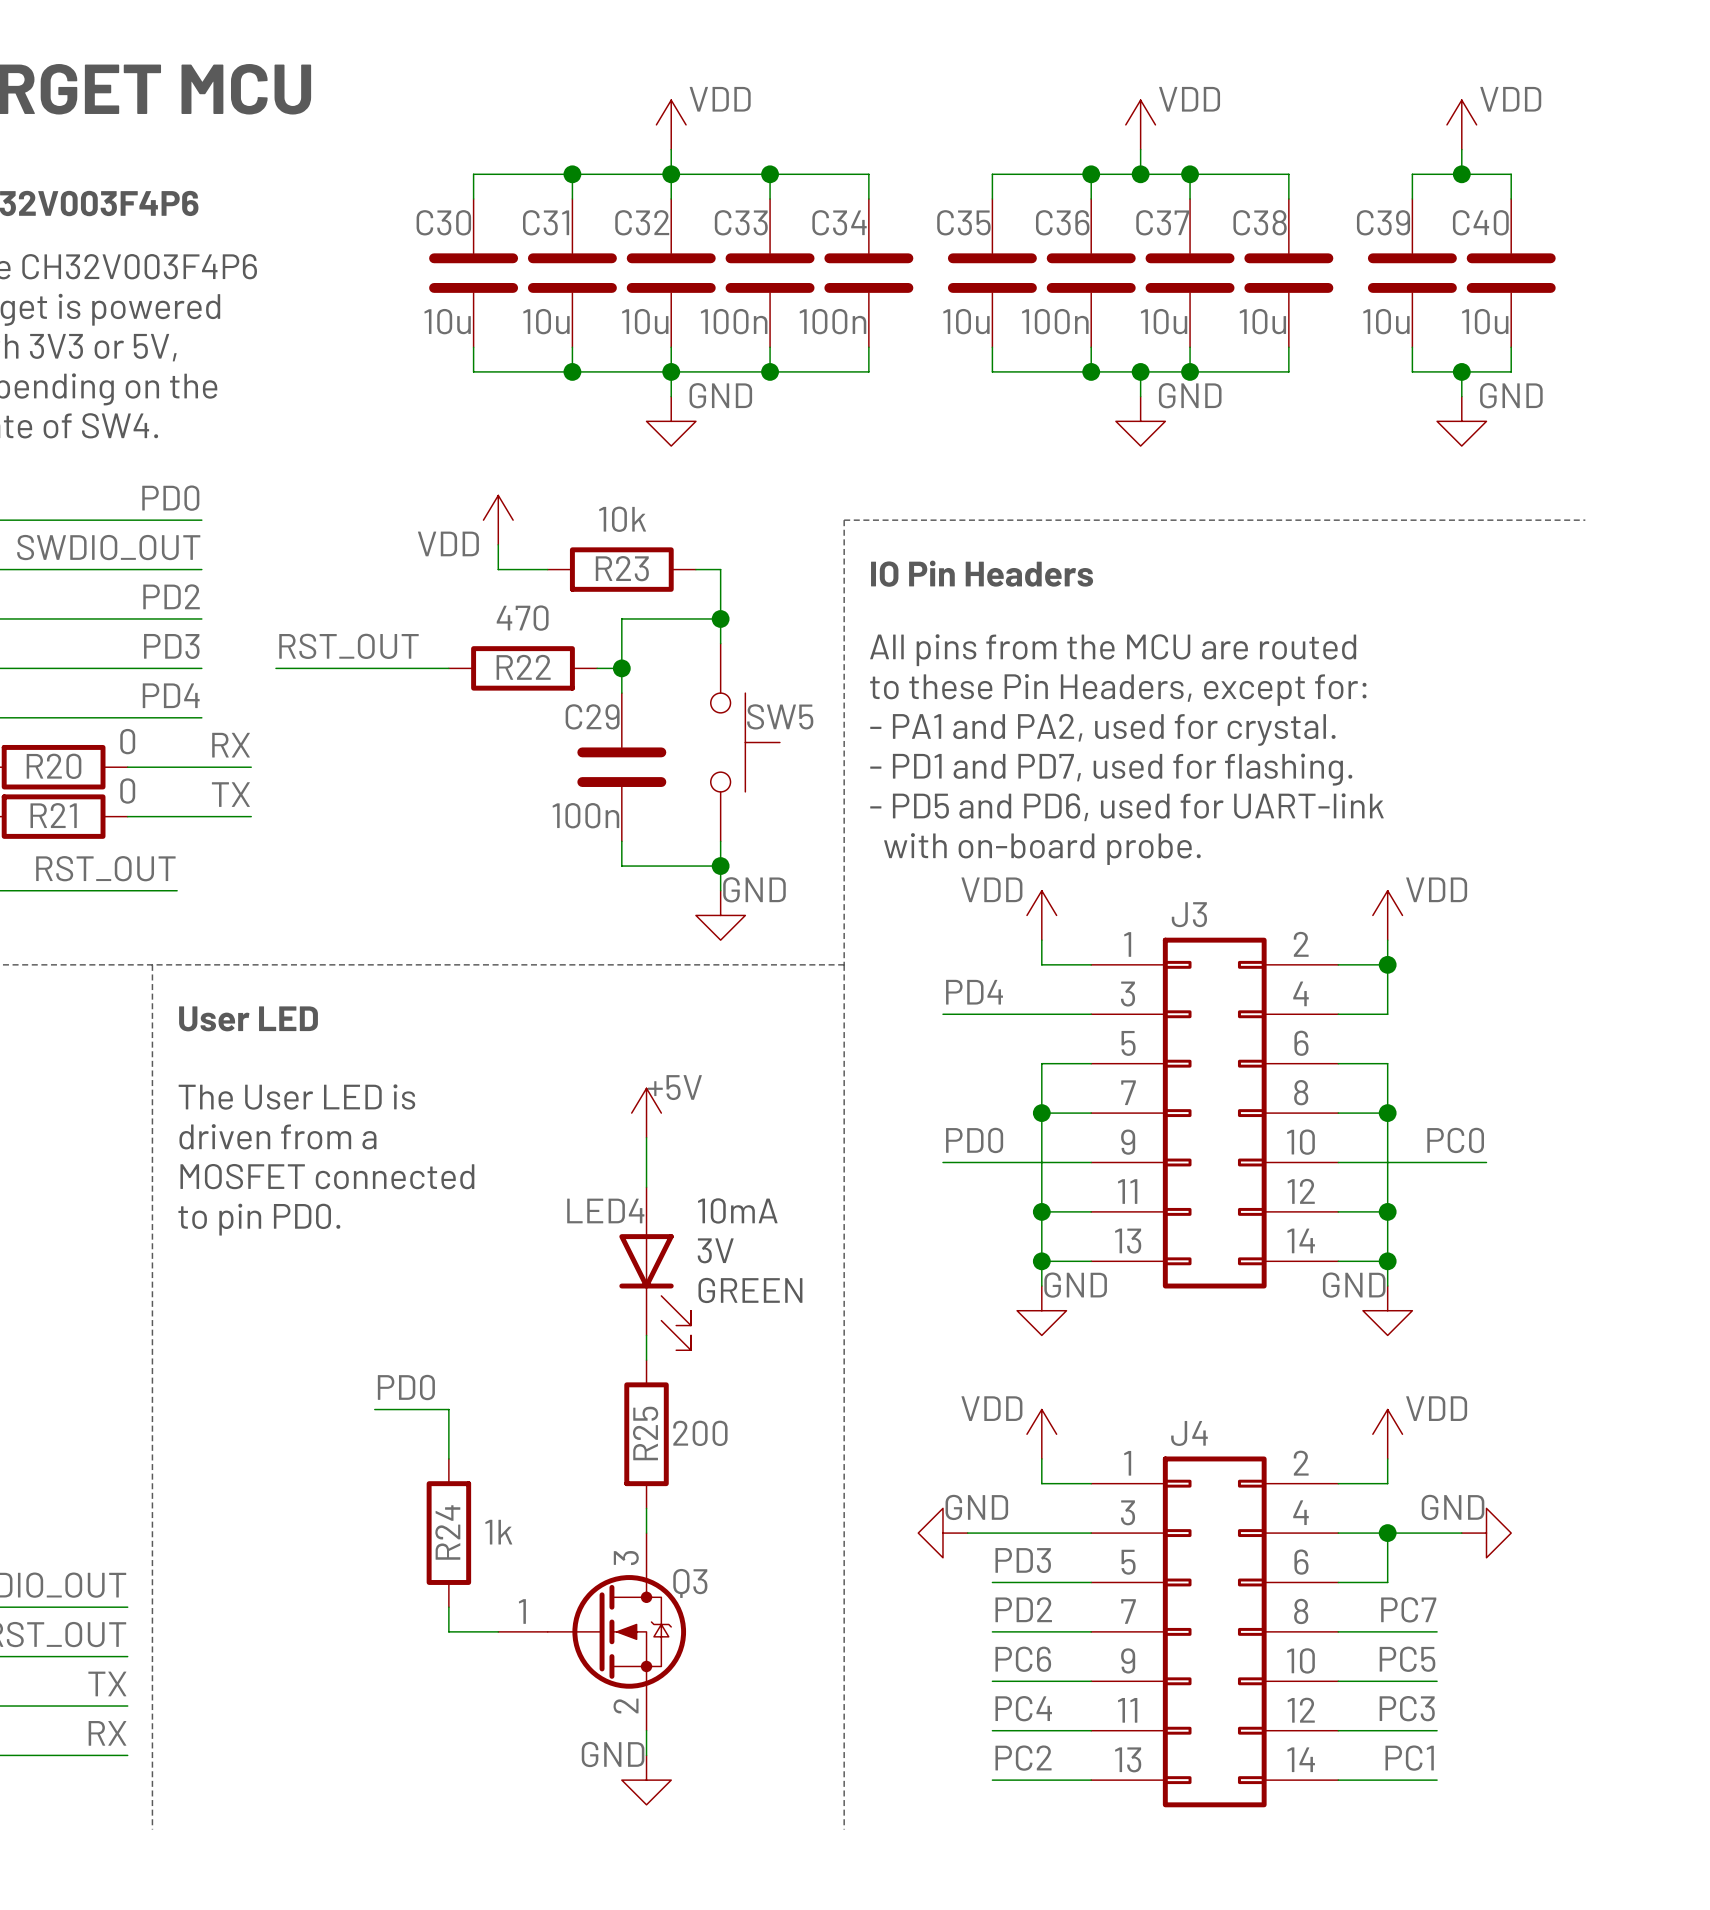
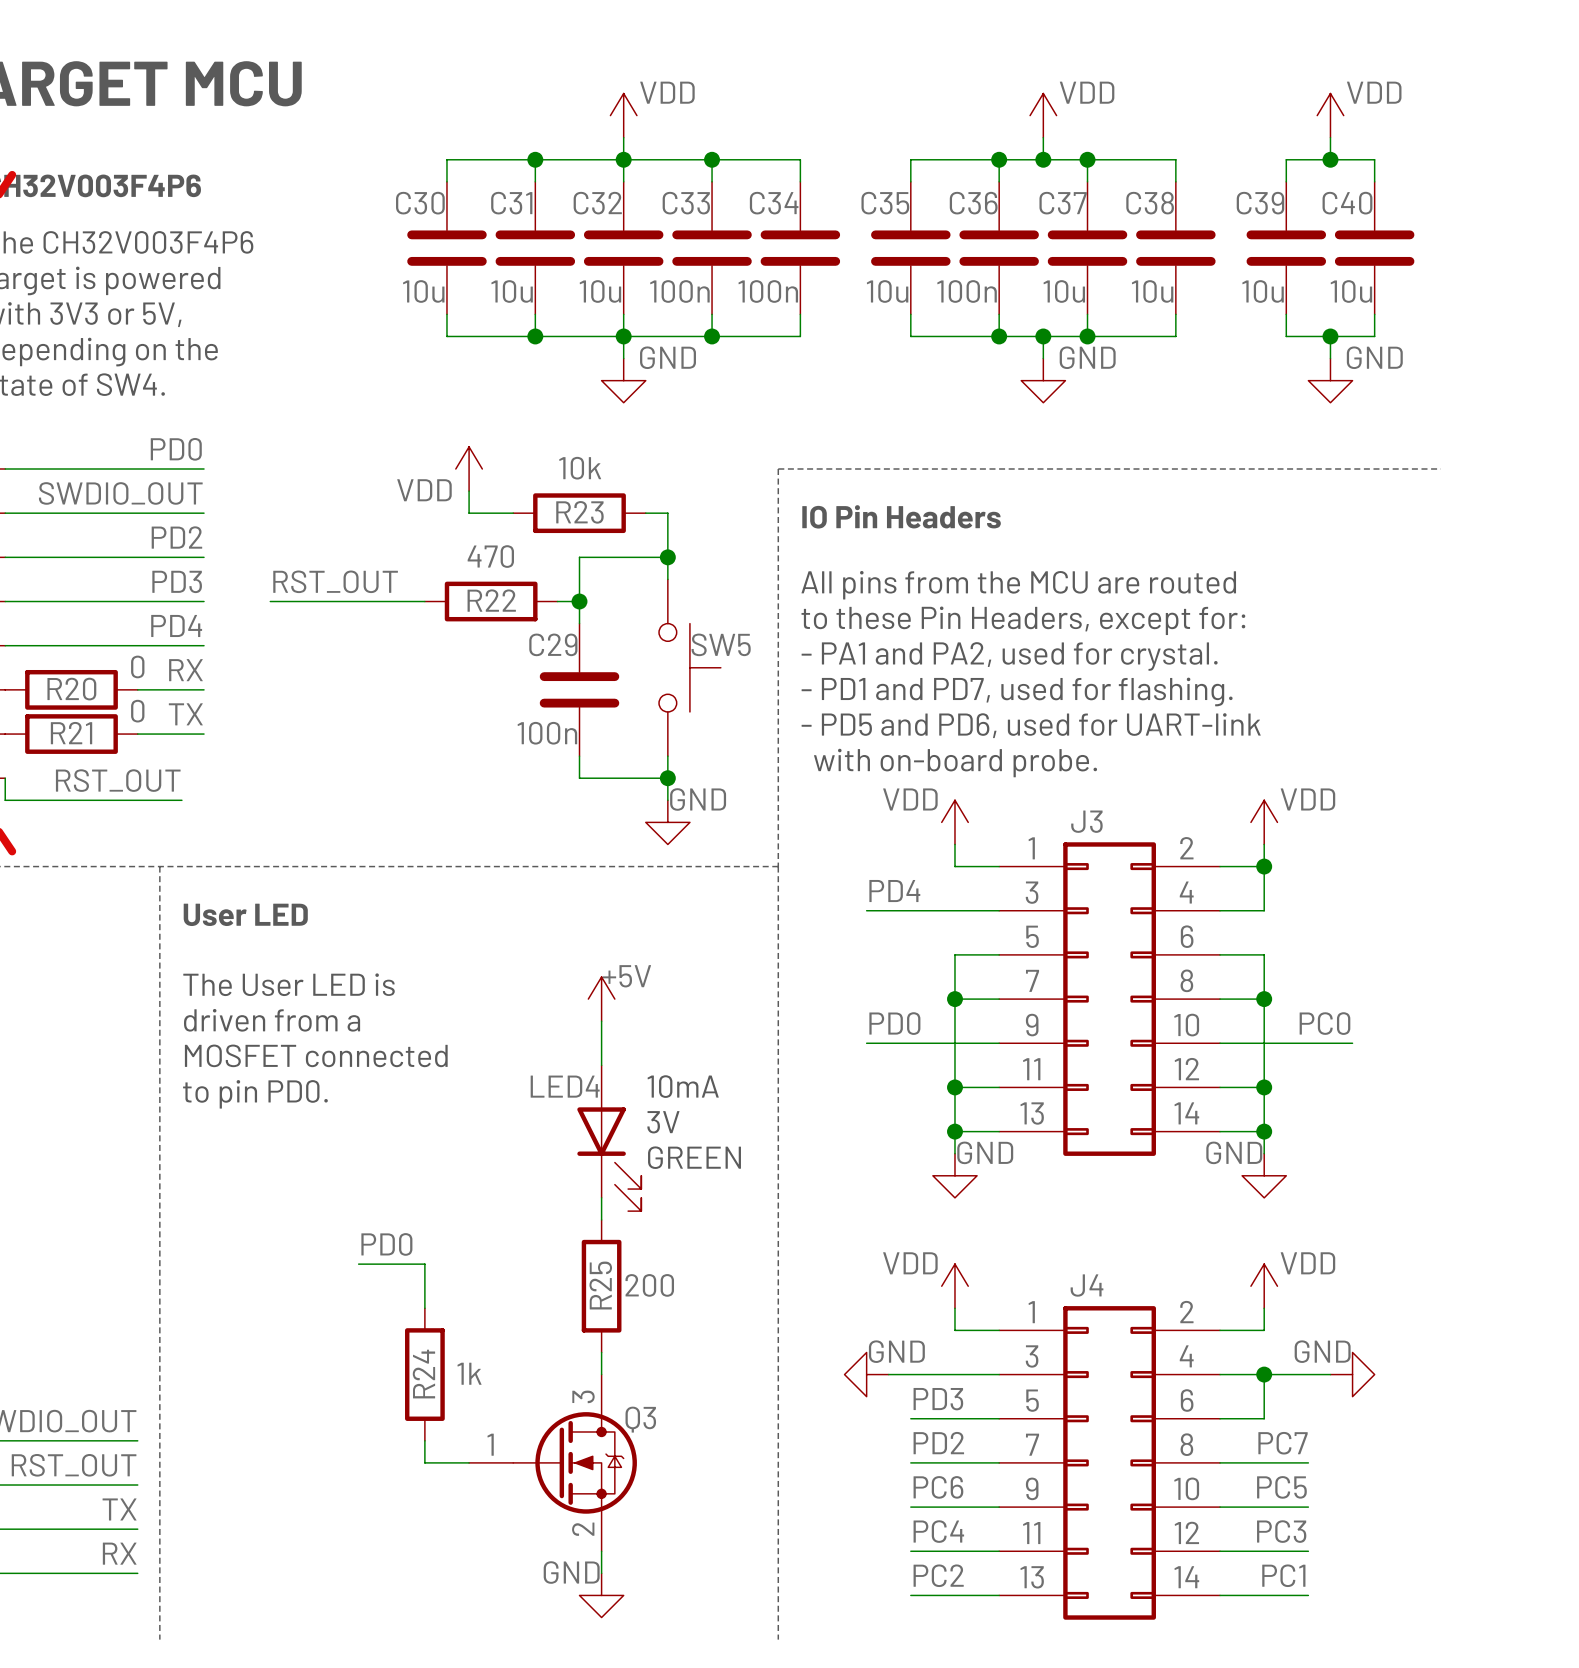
label position: RX (231, 745) -> RX (185, 670)
wire: (201, 767) (251, 767) -> none
label position: TX (230, 794) -> TX (185, 714)
wire: (201, 816) (251, 816) -> none

